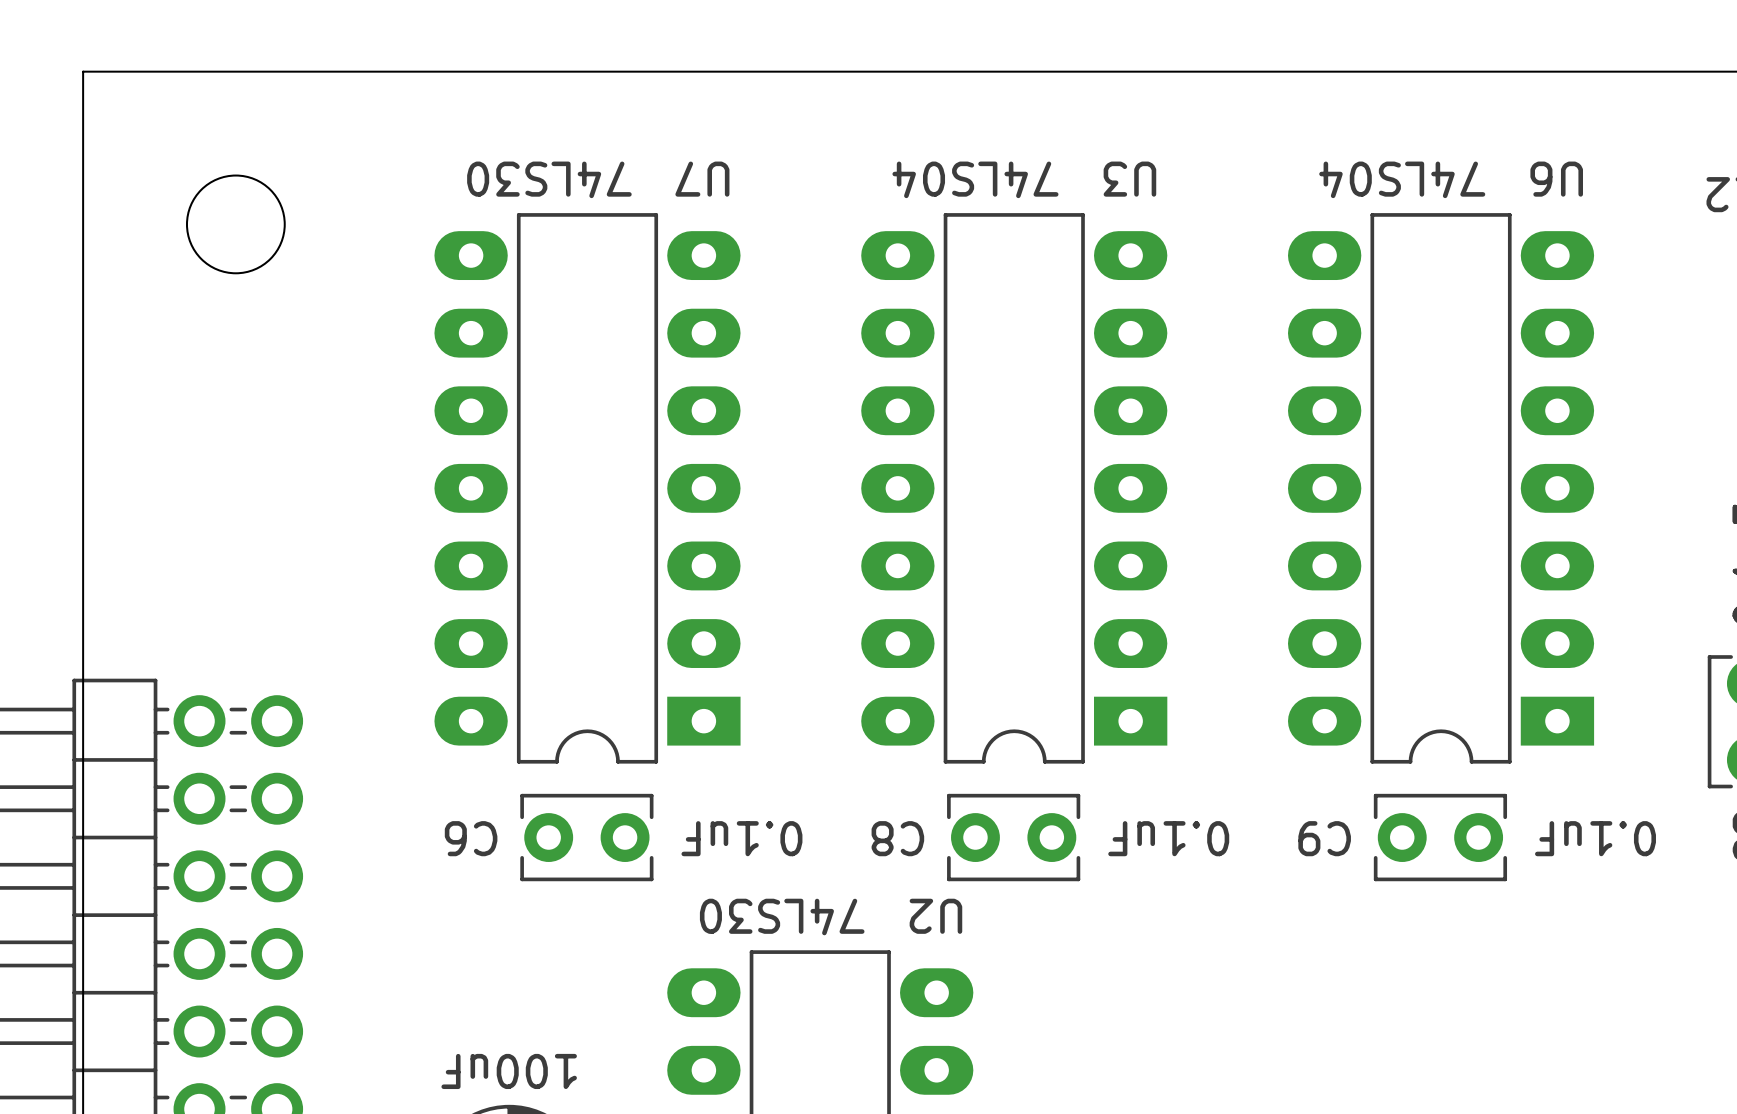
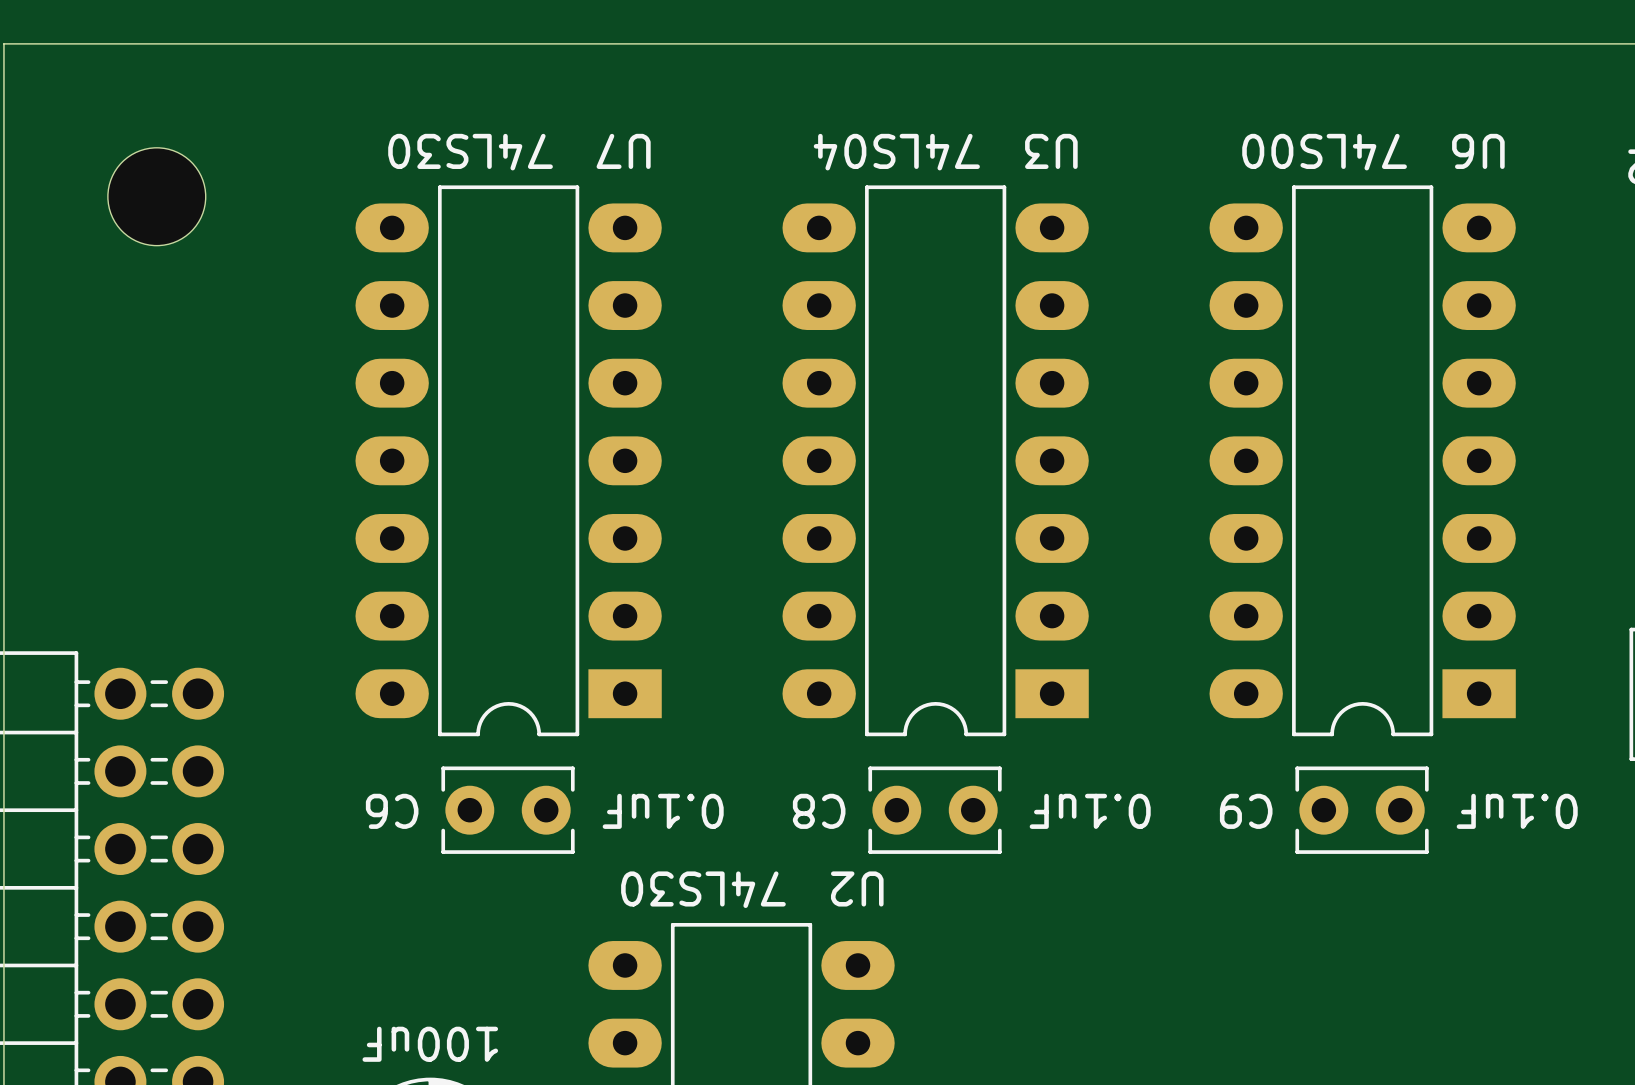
text: 74LS04 (1402, 179) -> 74LS00 (1324, 152)

